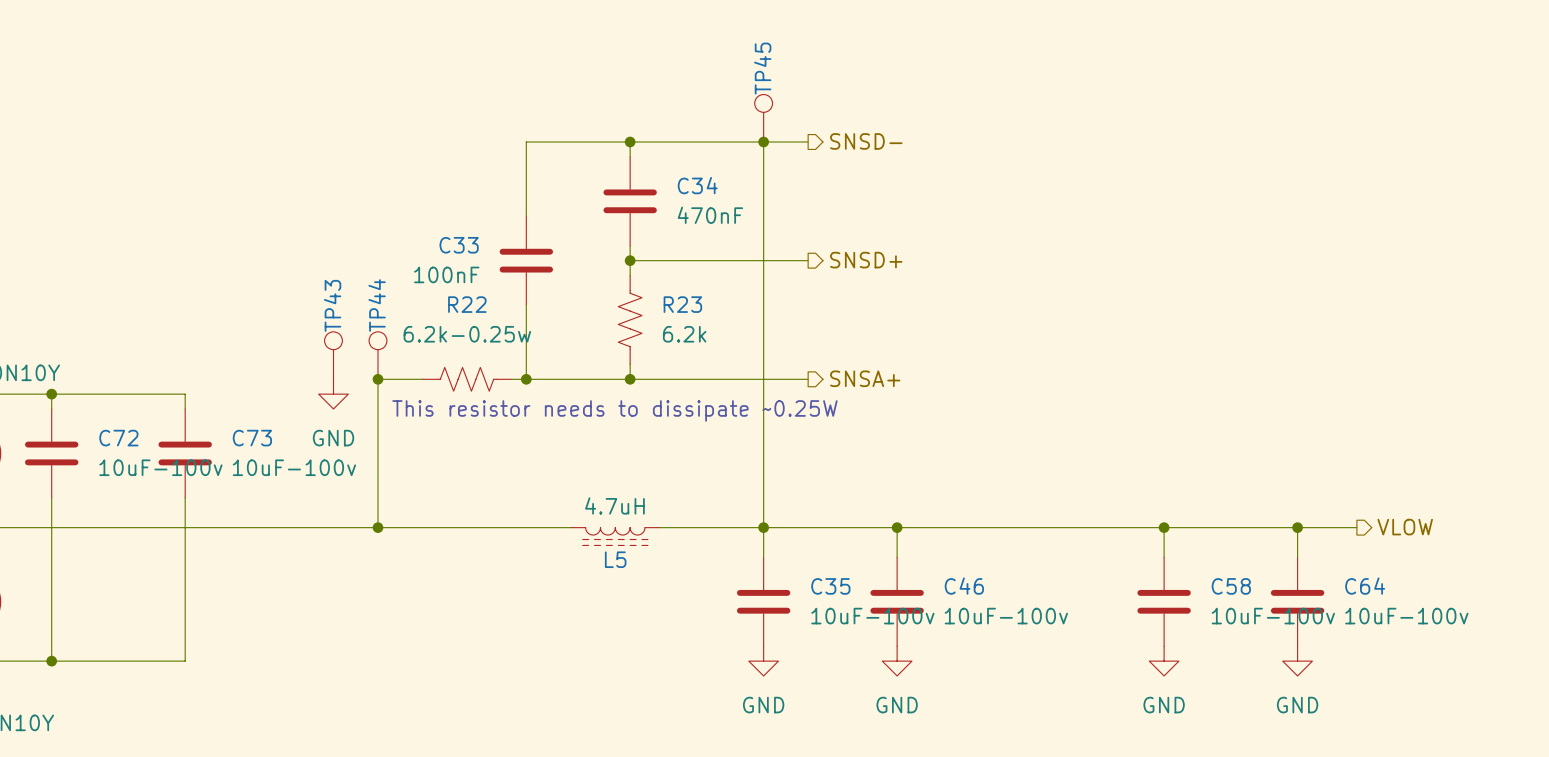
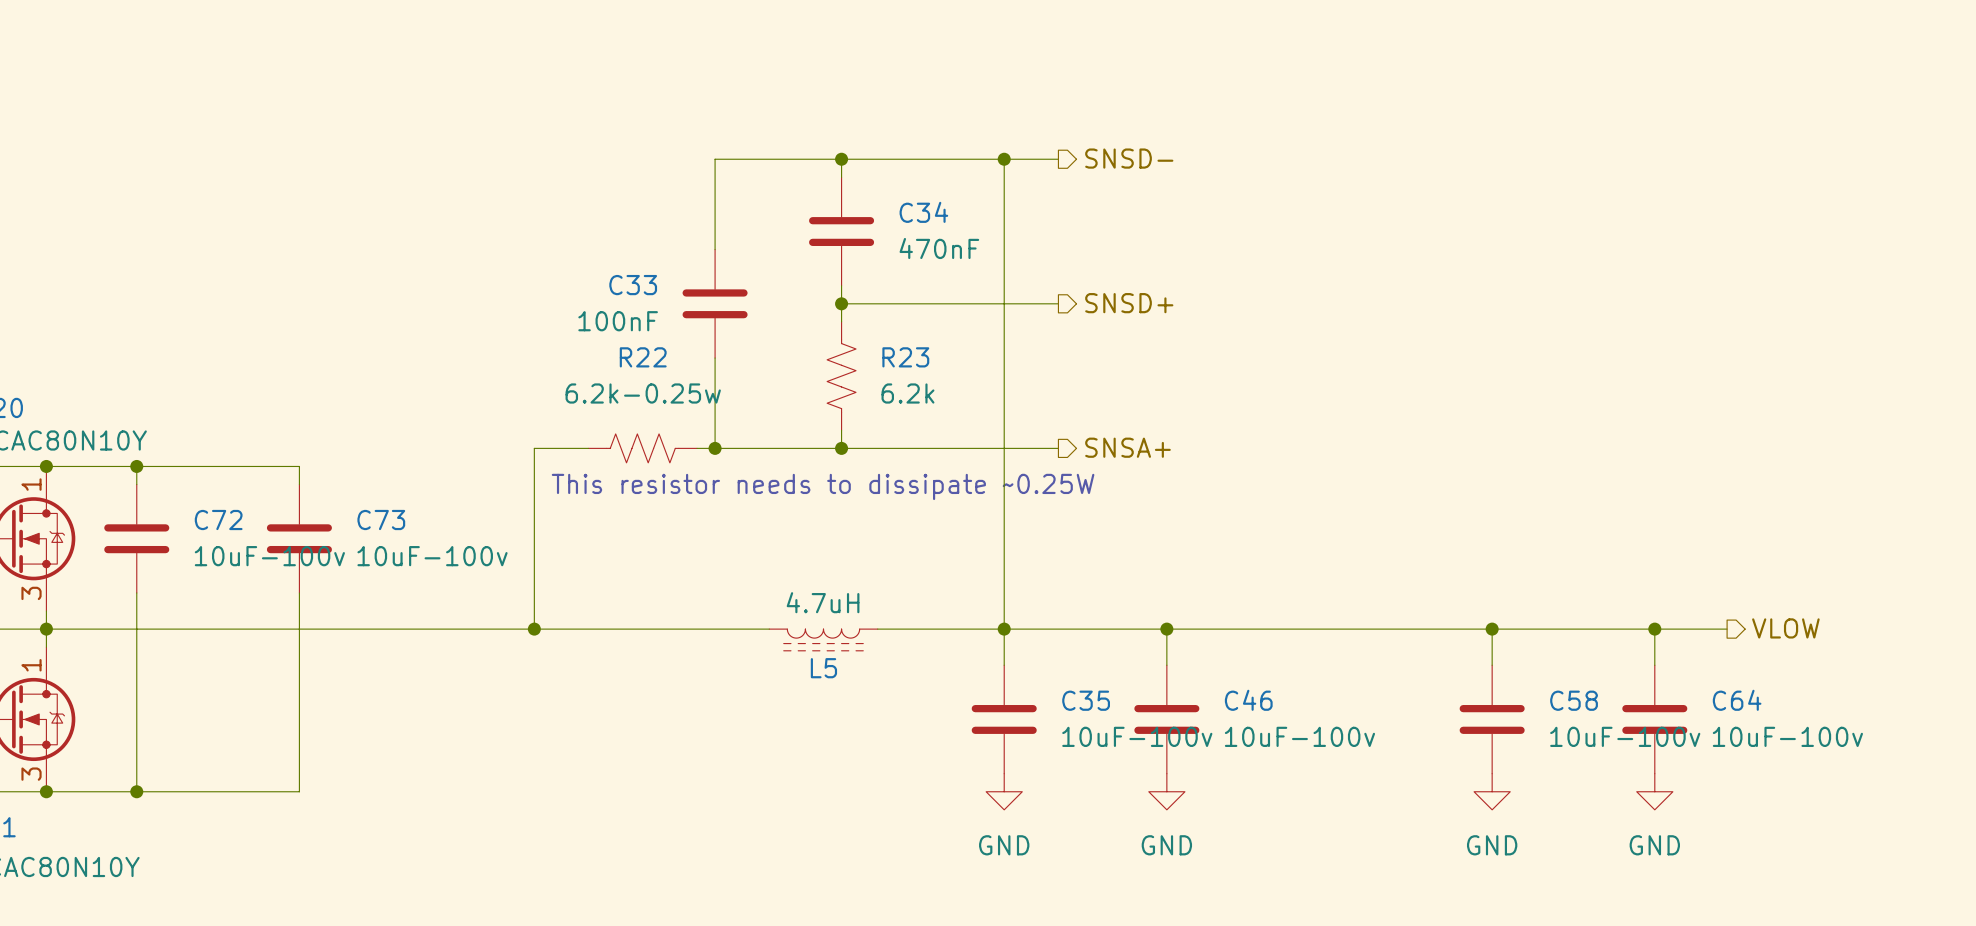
TP45: (763, 118) -> none
TP43: (333, 355) -> none
TP44: (378, 355) -> none
junction: (378, 379) -> none
power symbol: GND (333, 394) -> none

